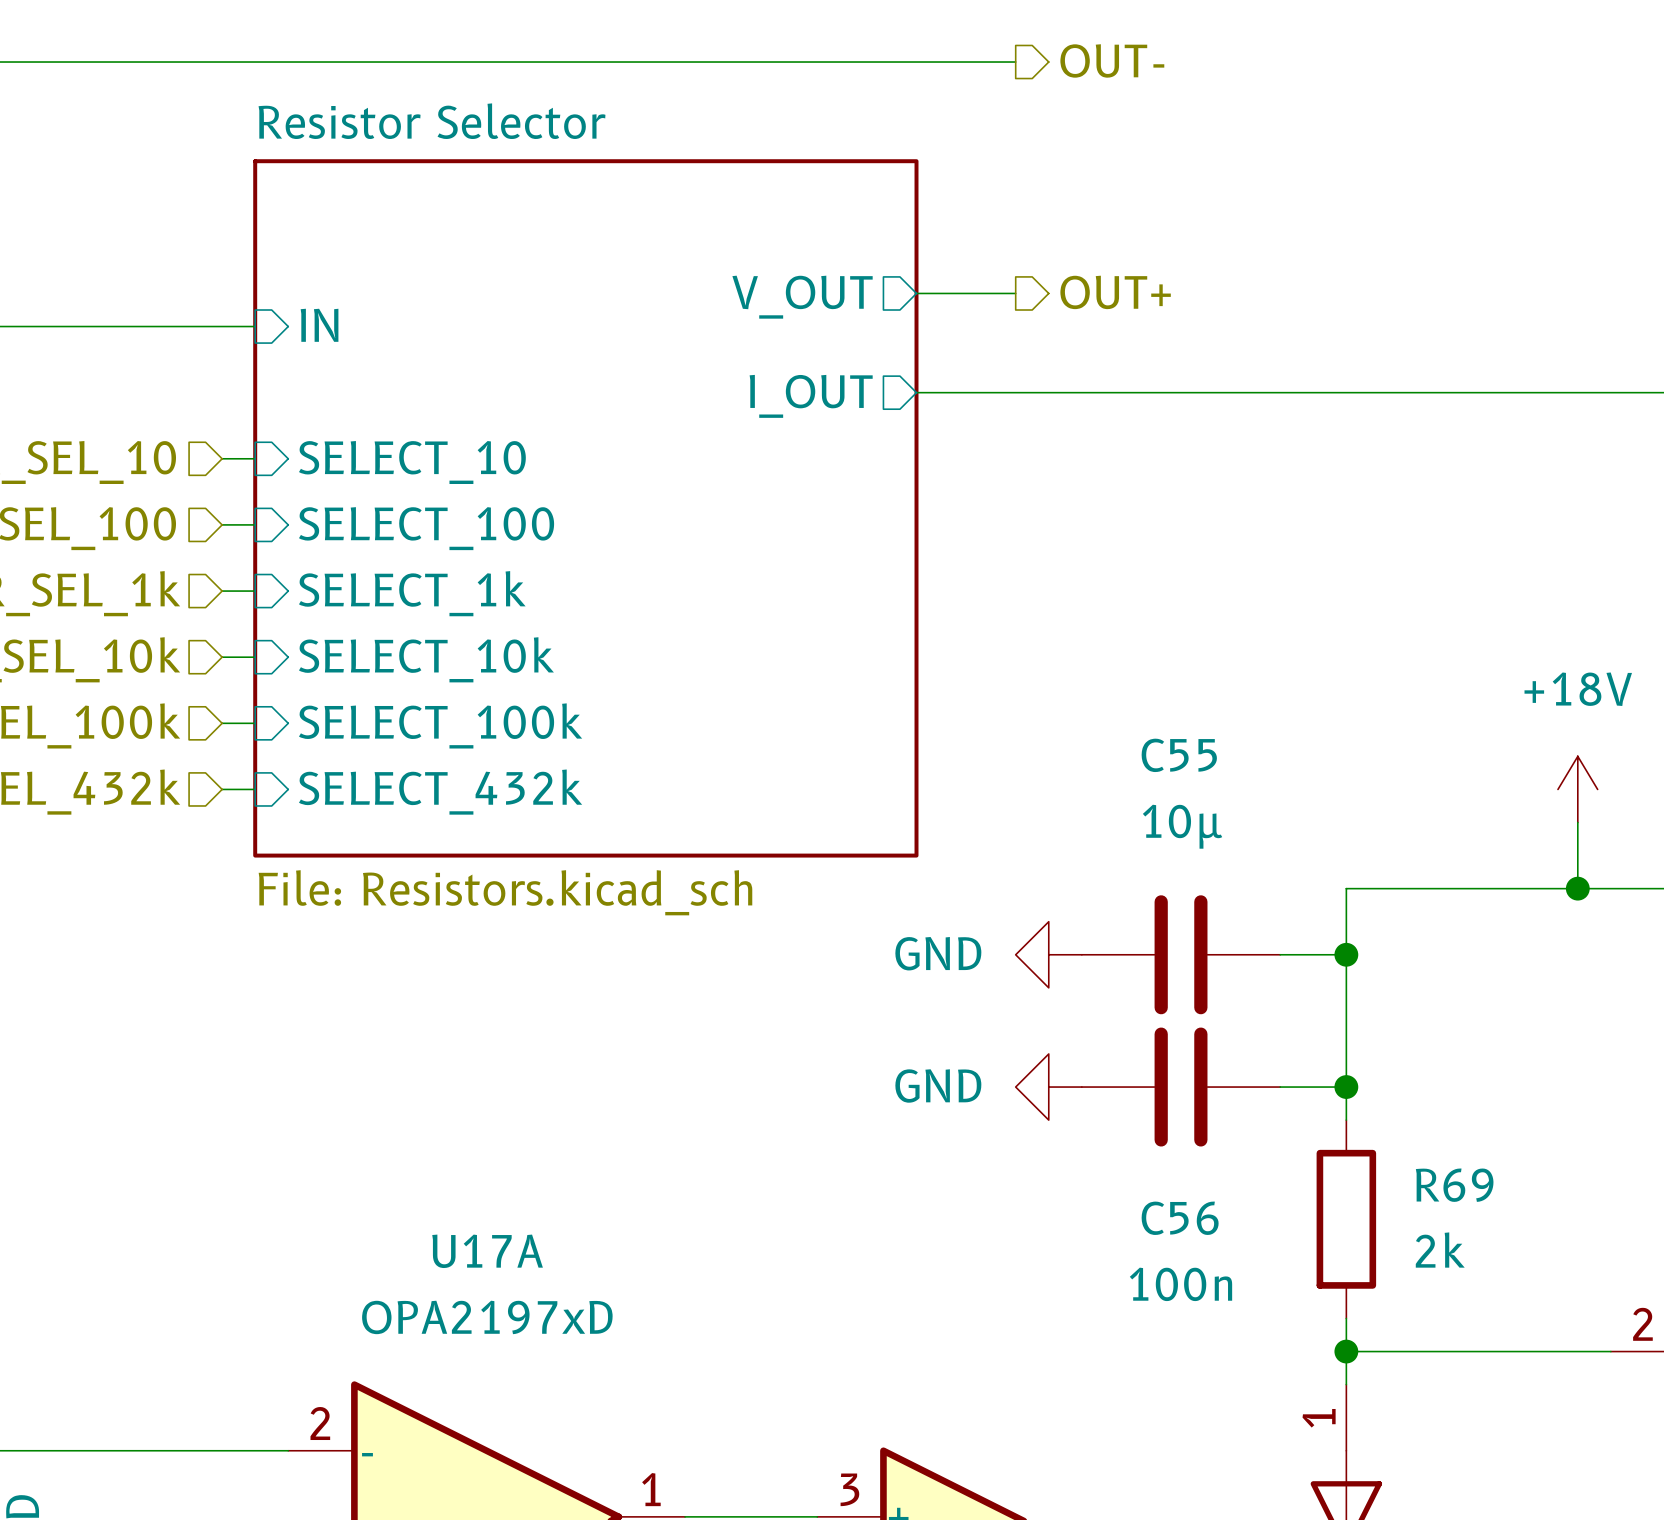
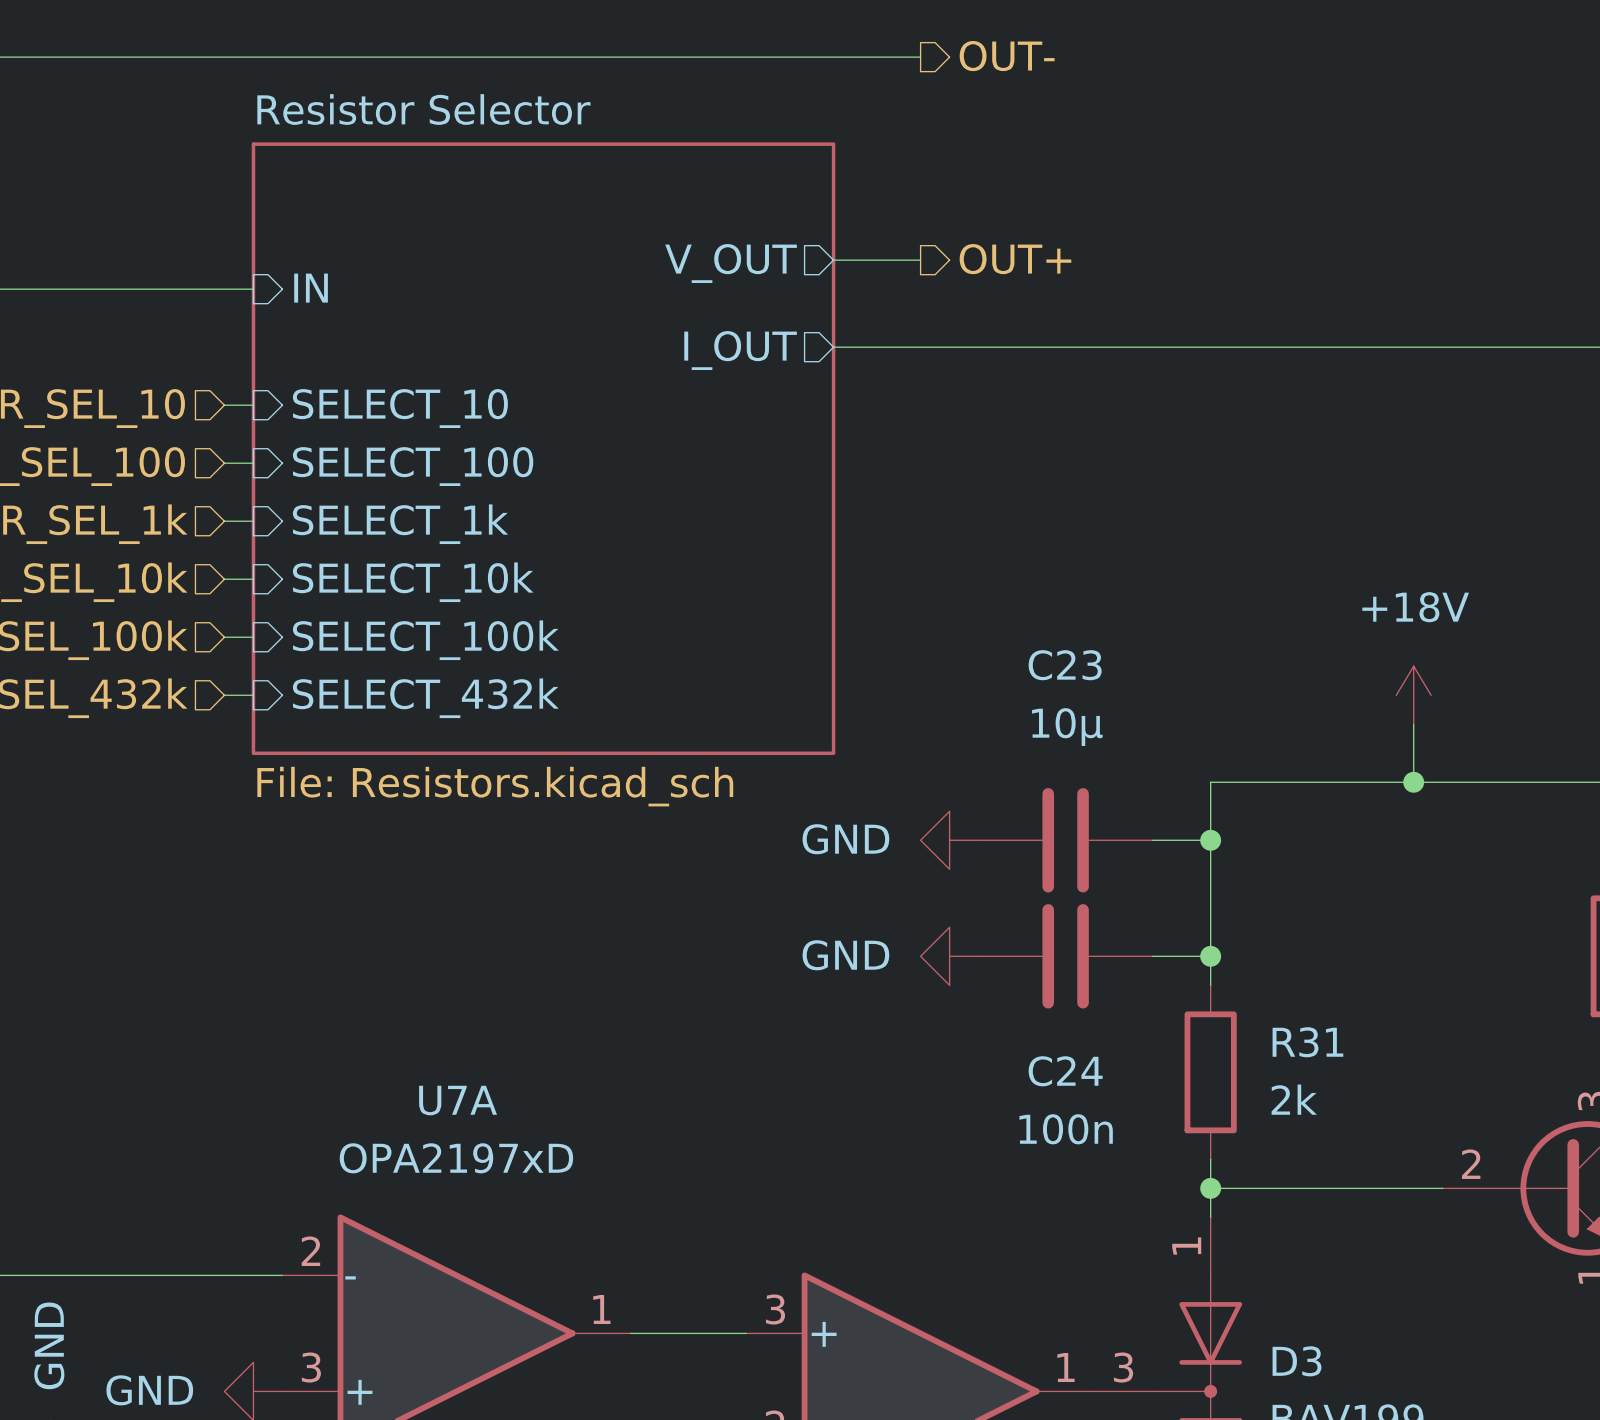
C55 name: C55 (1179, 755) -> C23 (1065, 665)
R69 name: R69 (1454, 1185) -> R31 (1307, 1042)
C56 name: C56 (1180, 1218) -> C24 (1065, 1071)
U17A name: U17A (487, 1251) -> U7A (458, 1100)

